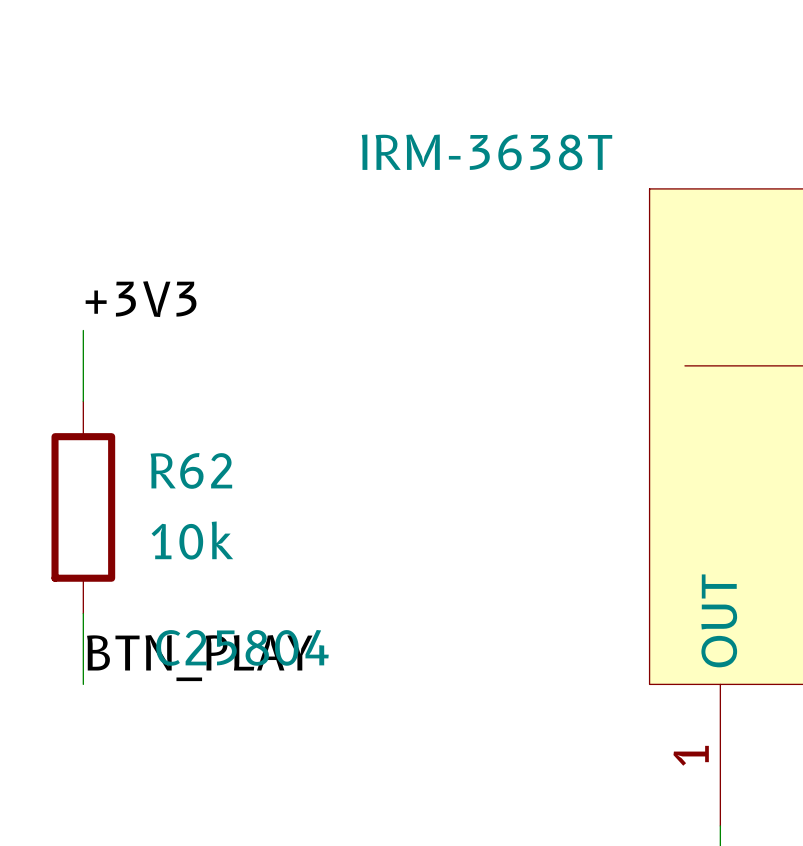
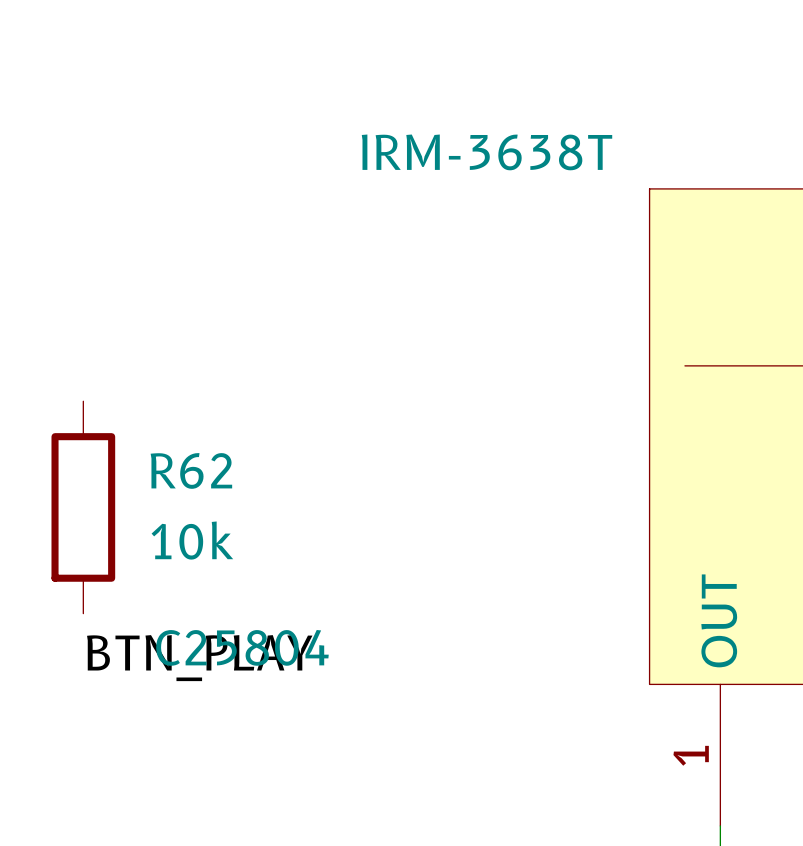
label: +3V3 (141, 299) -> none
wire: (83, 330) (83, 401) -> none
wire: (83, 613) (83, 684) -> none

